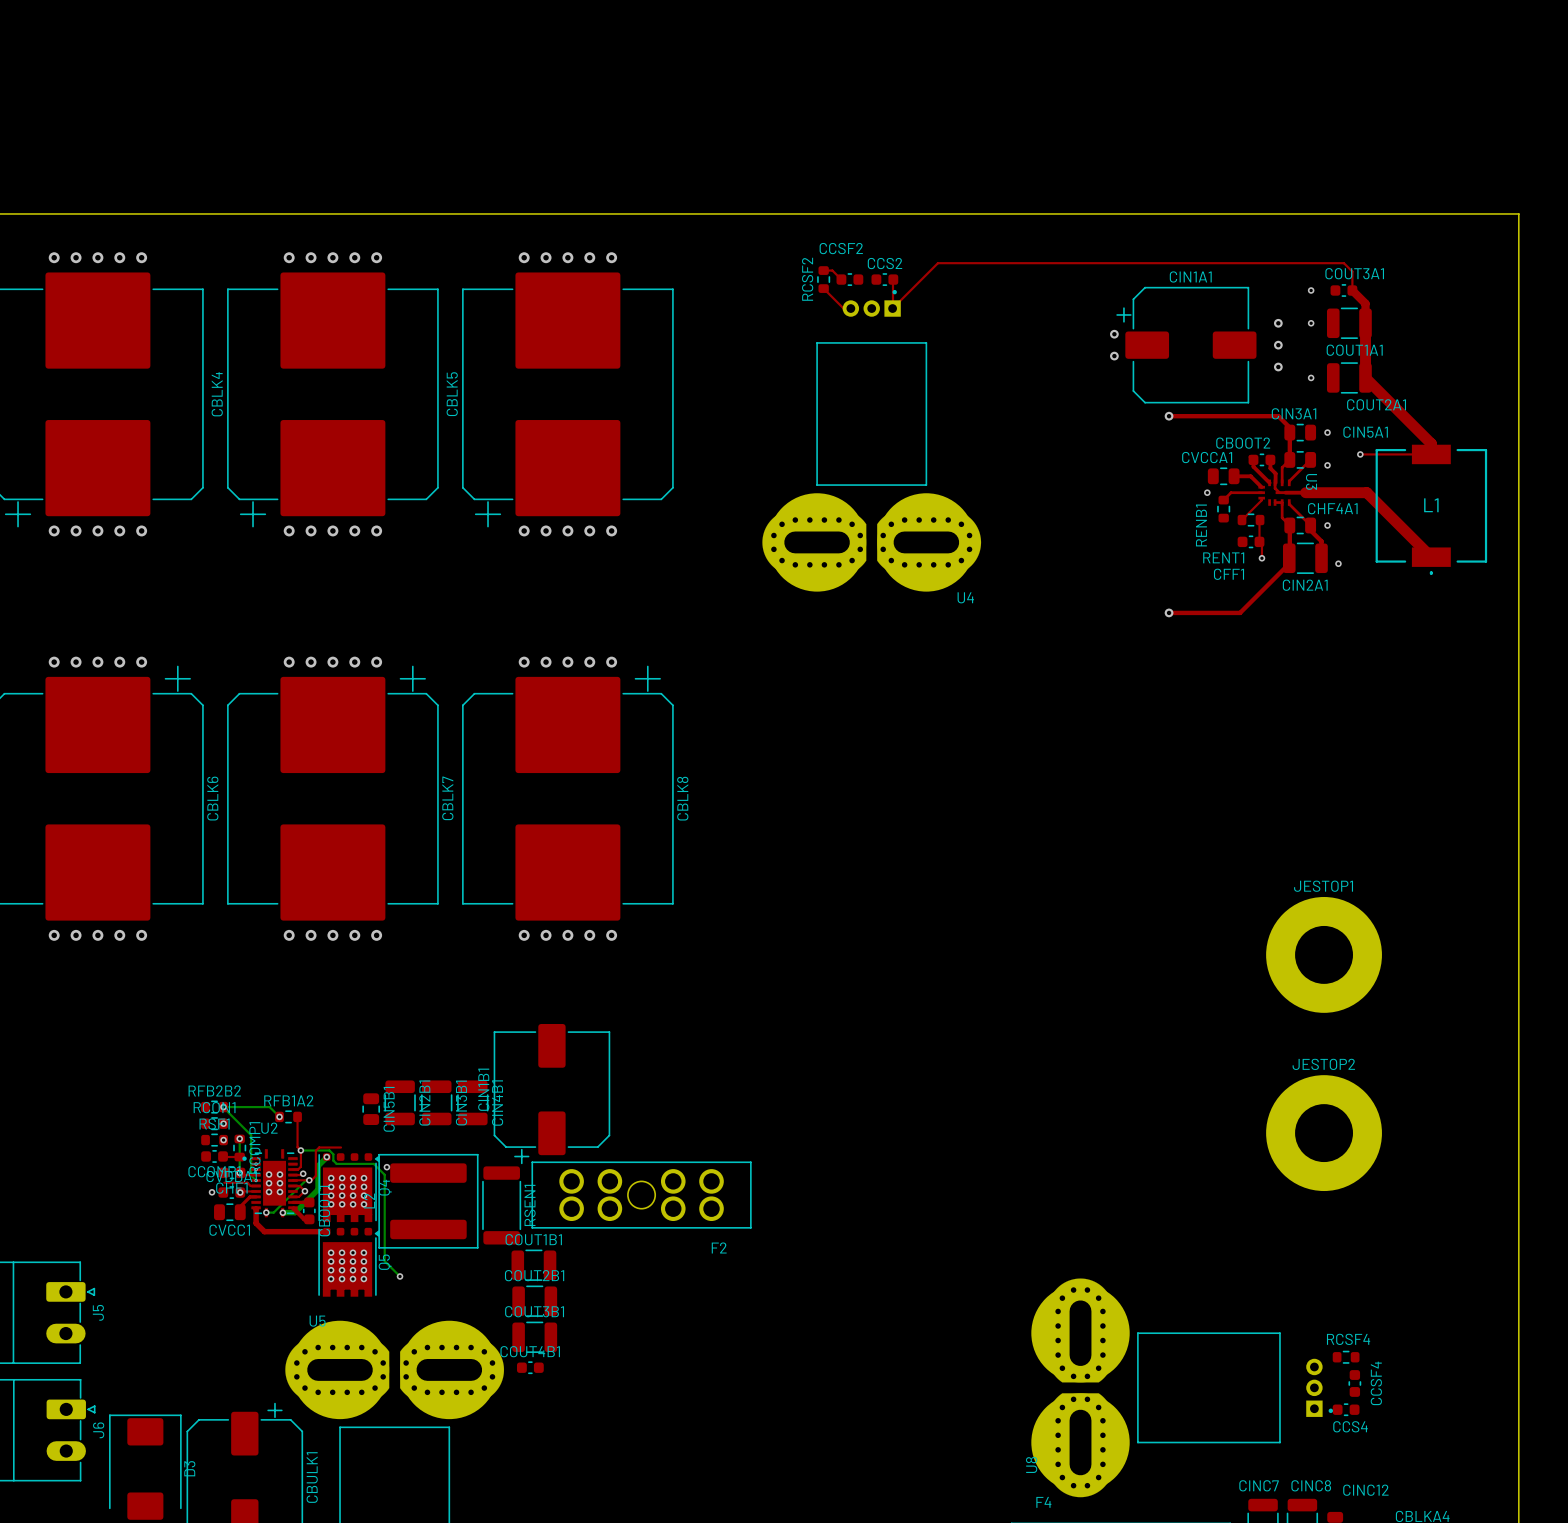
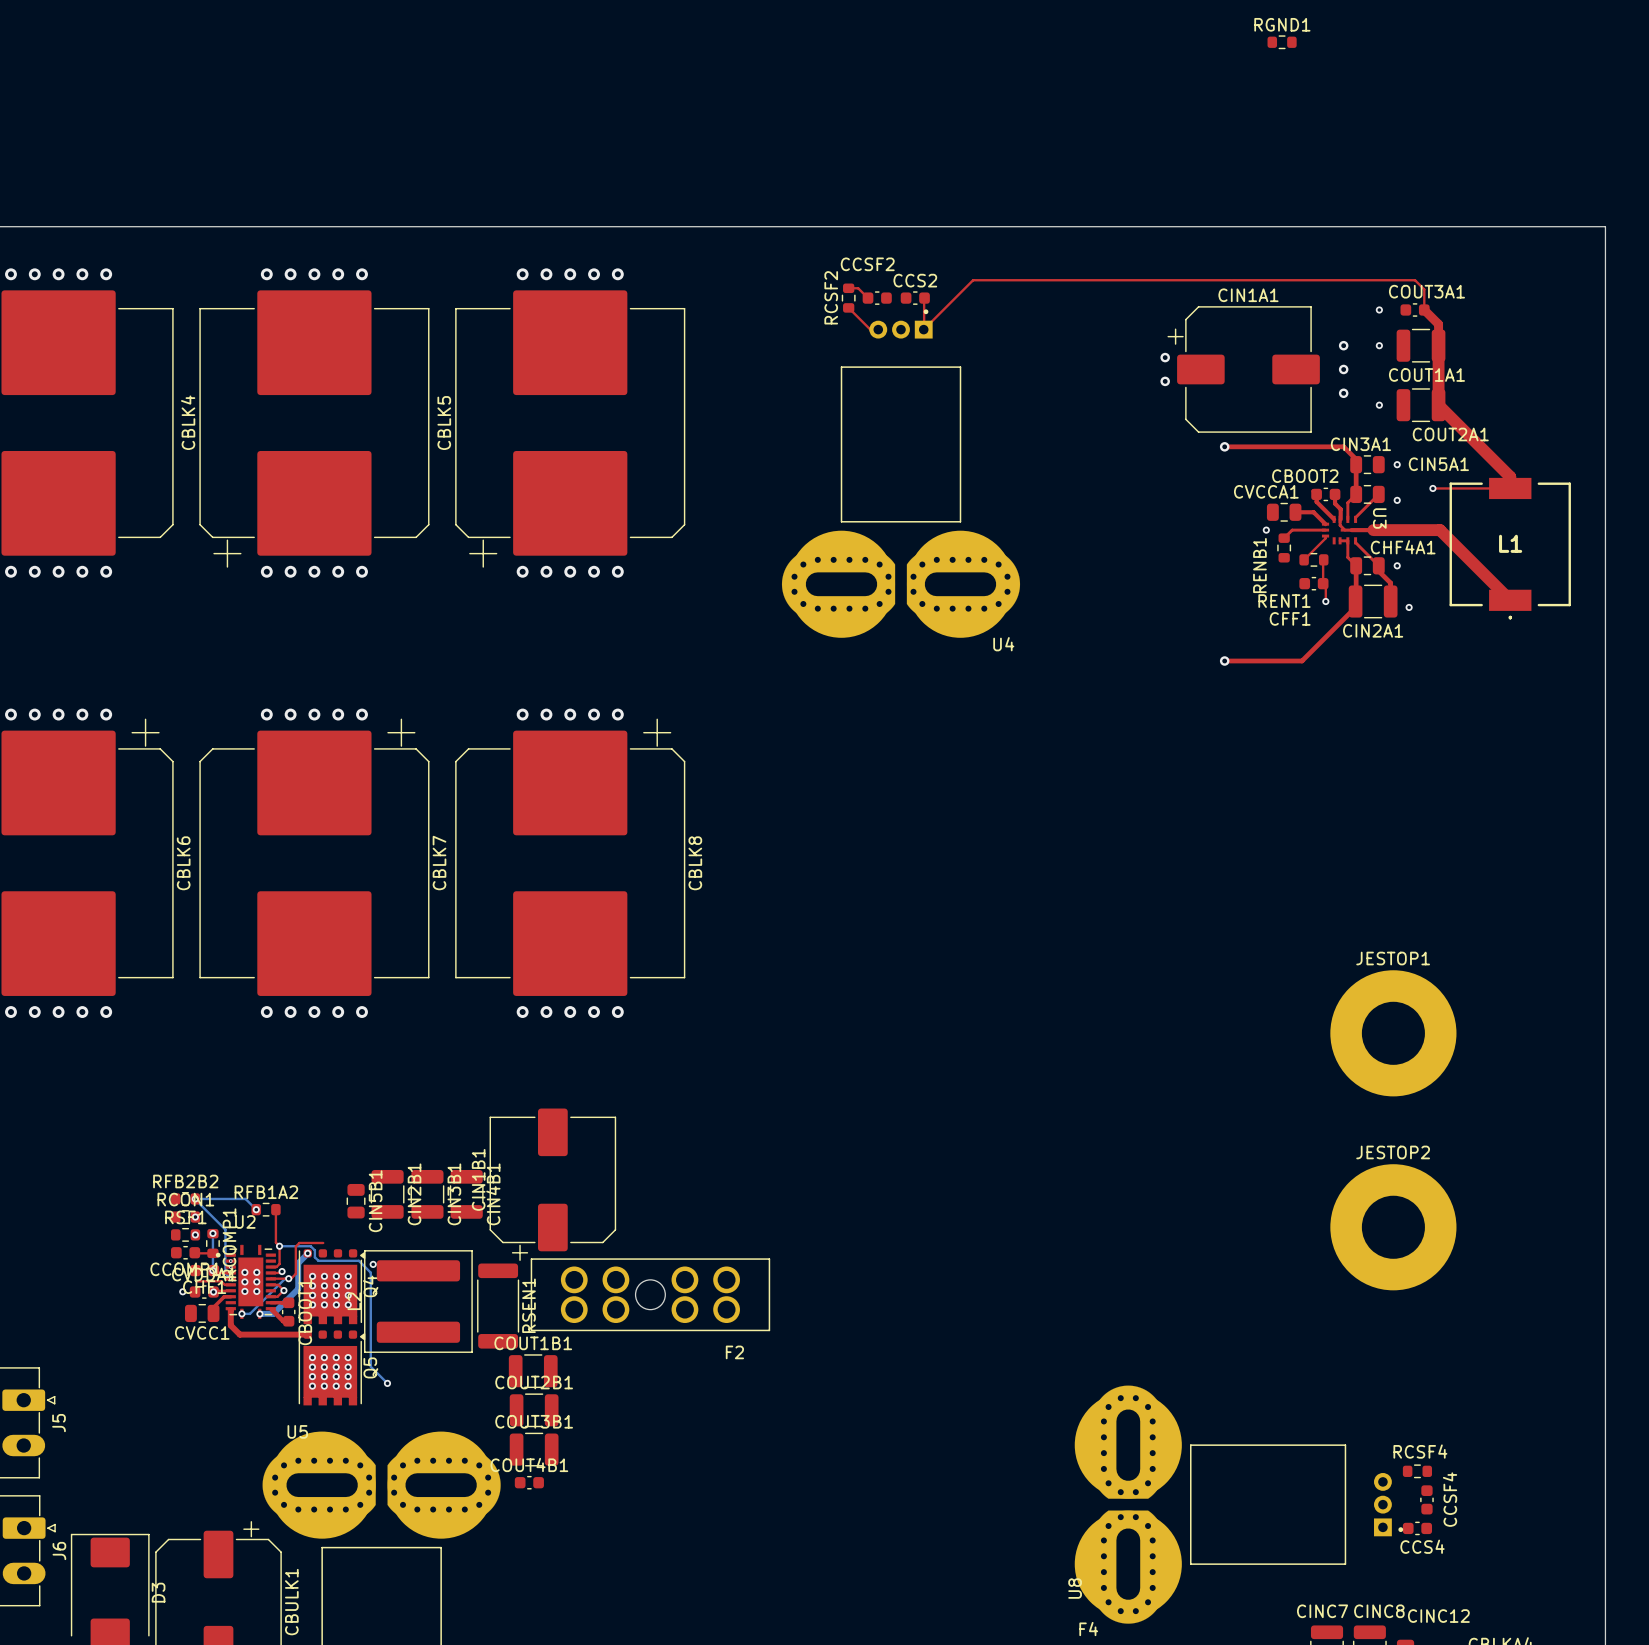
RGND1: none -> (1282, 42)

